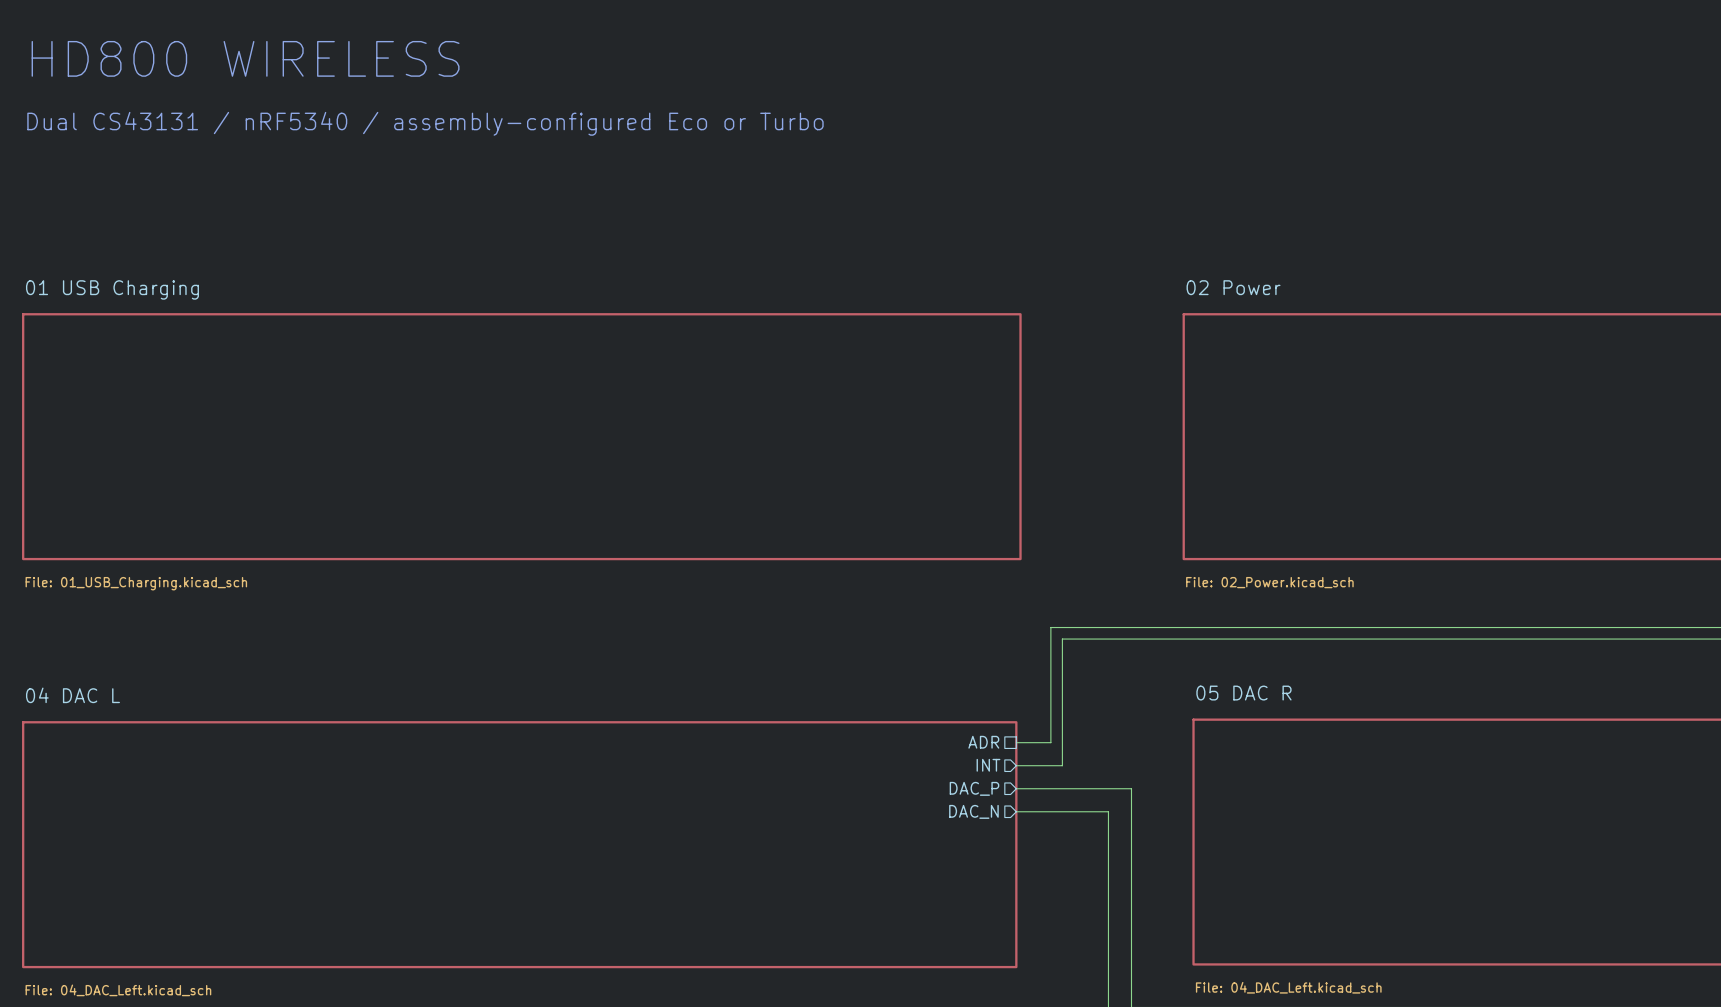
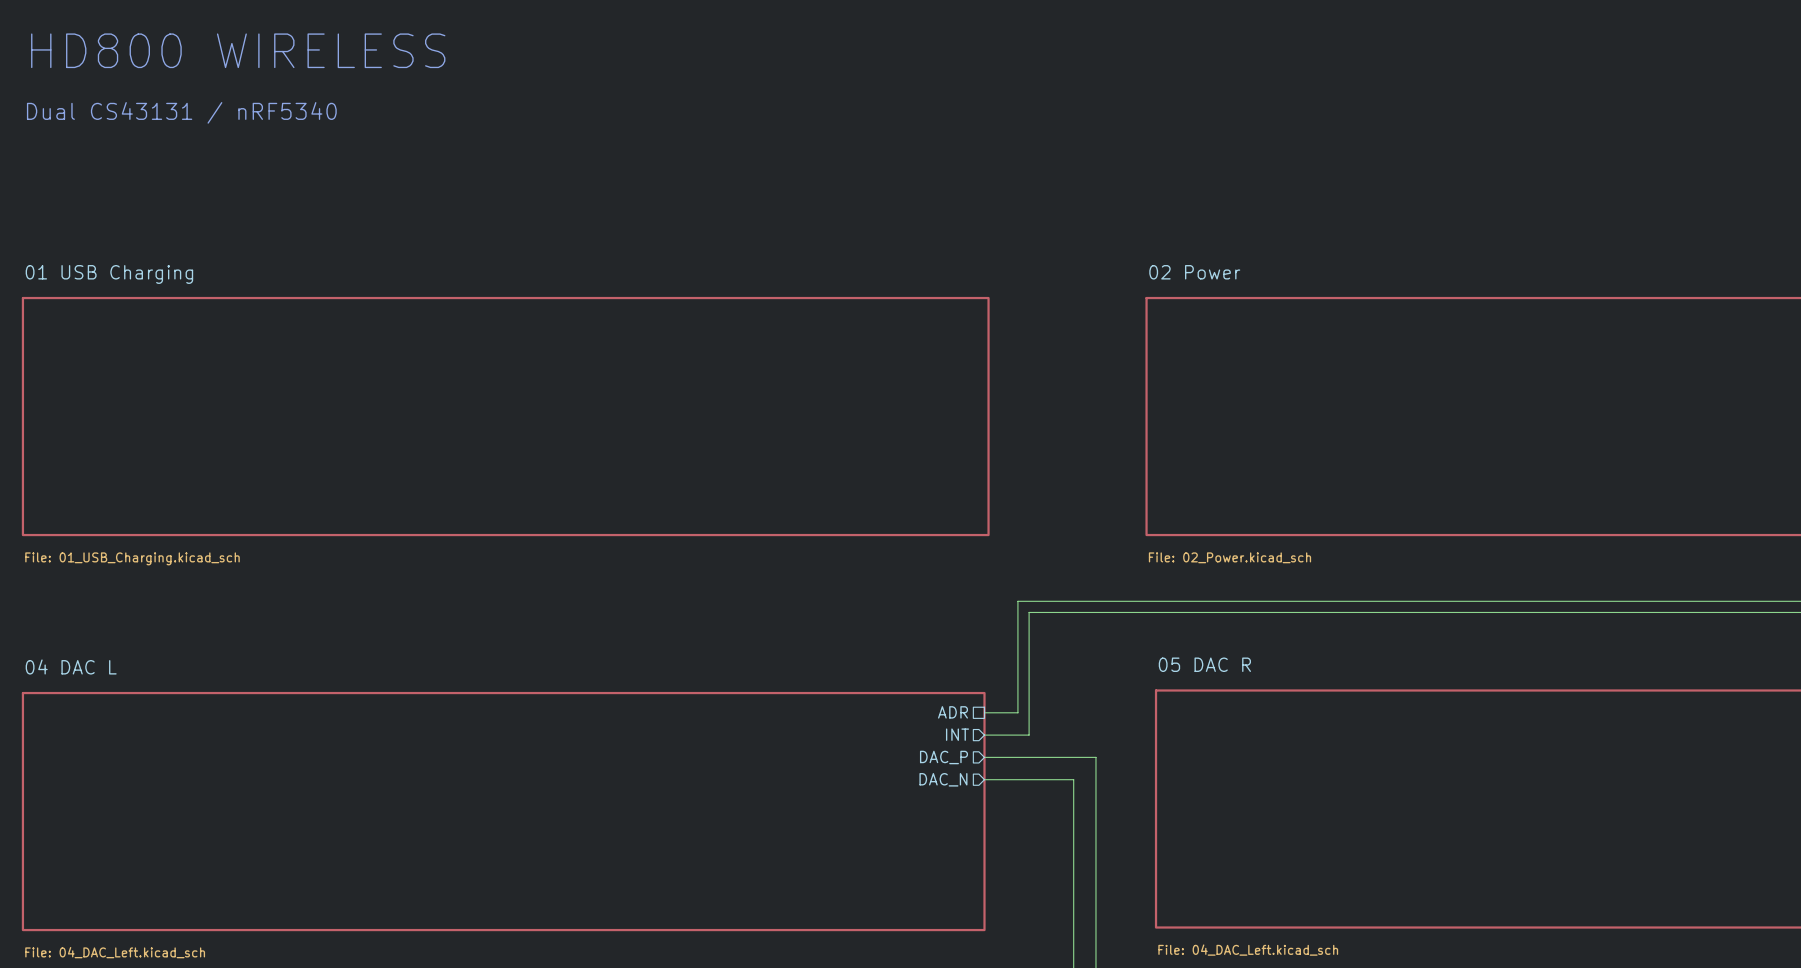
text: Dual CS43131 / nRF5340 / assembly-configured Eco or Turbo (425, 123) -> Dual CS43131 / nRF5340 (181, 112)

